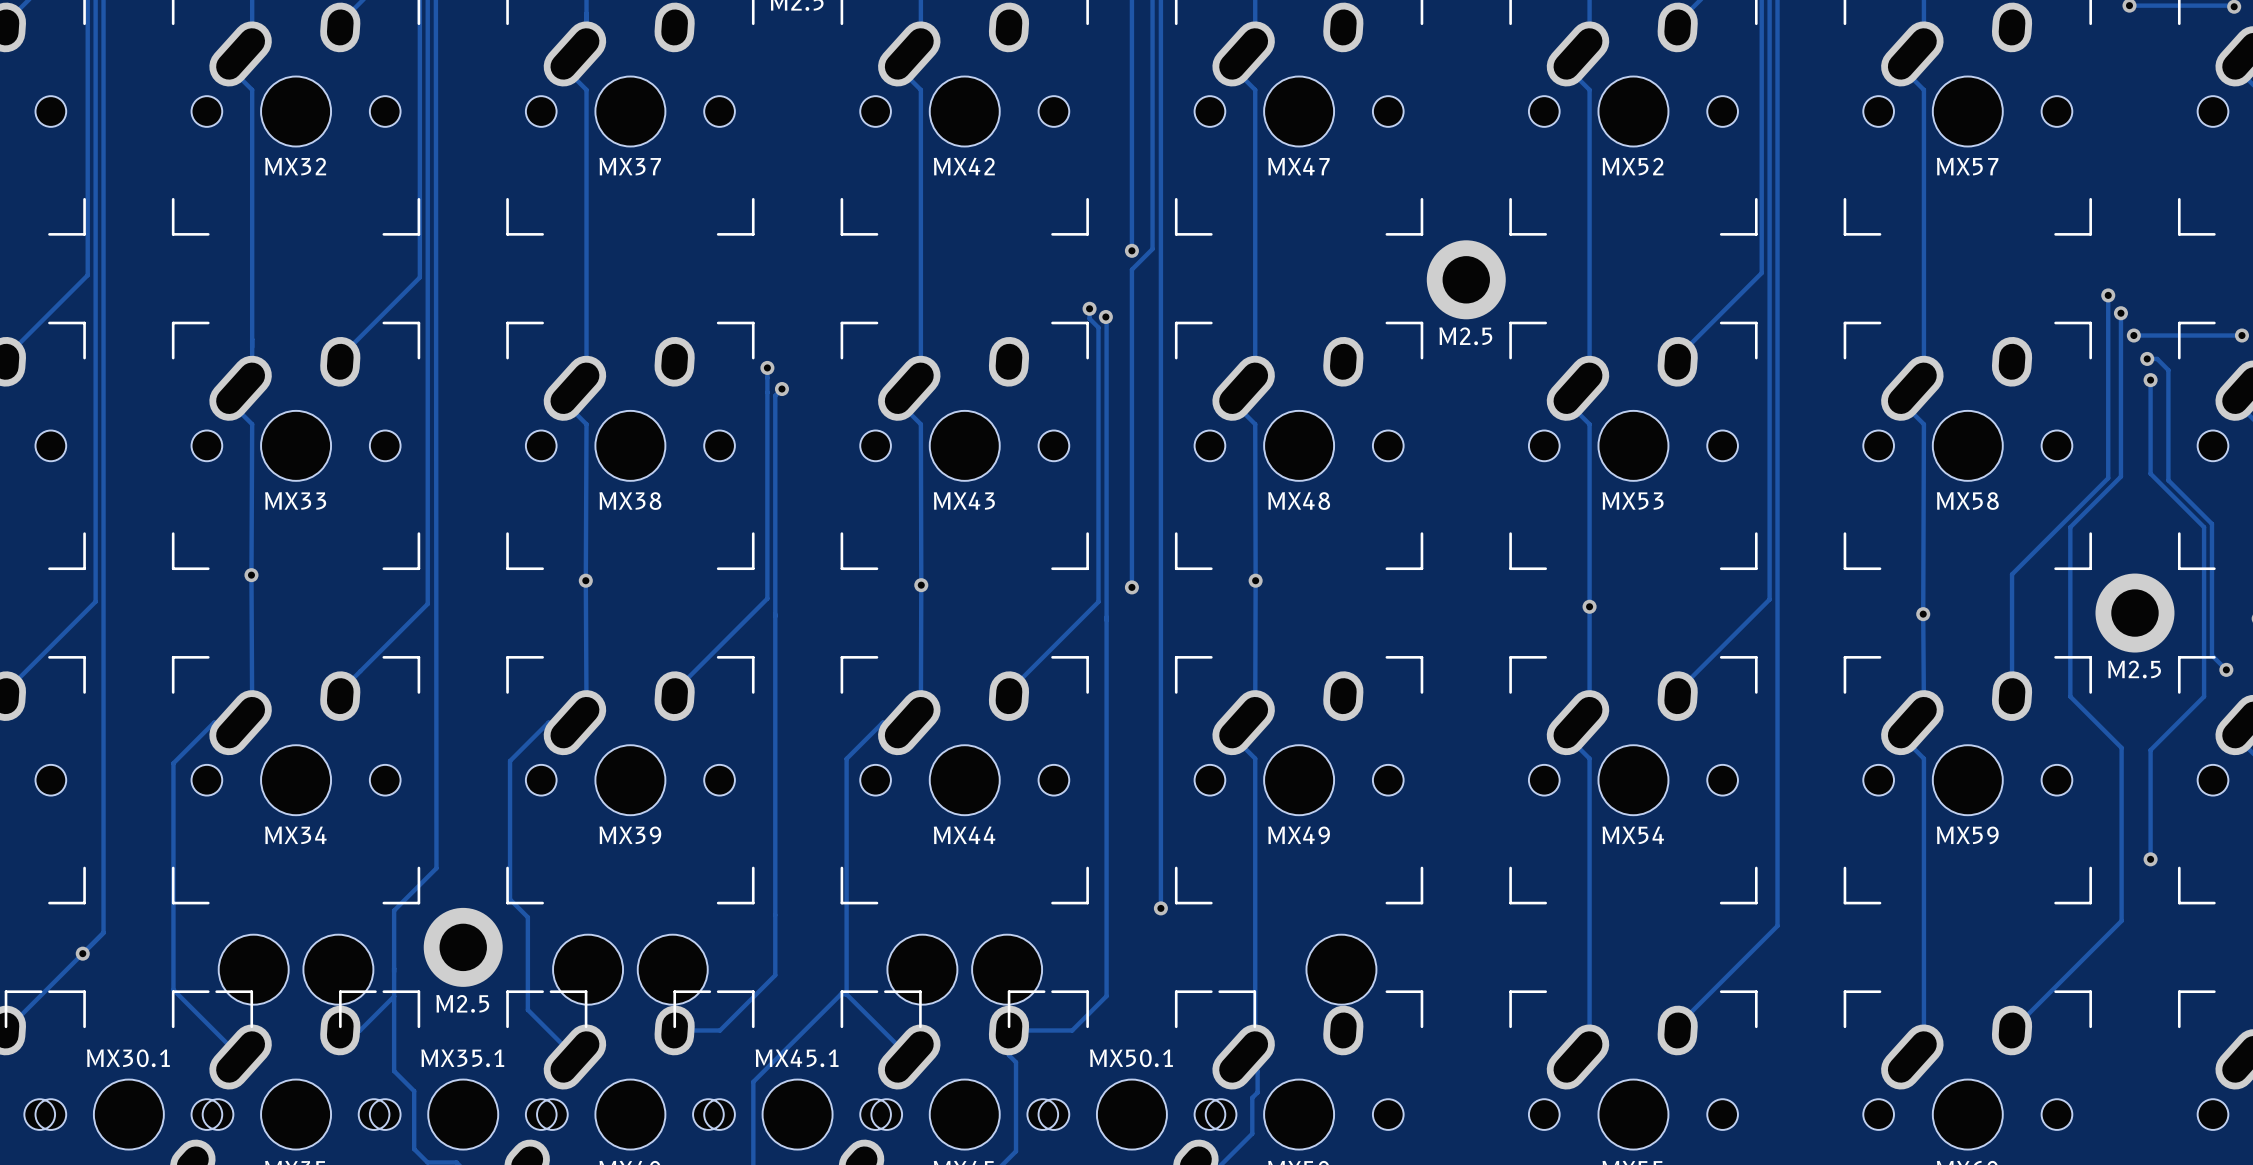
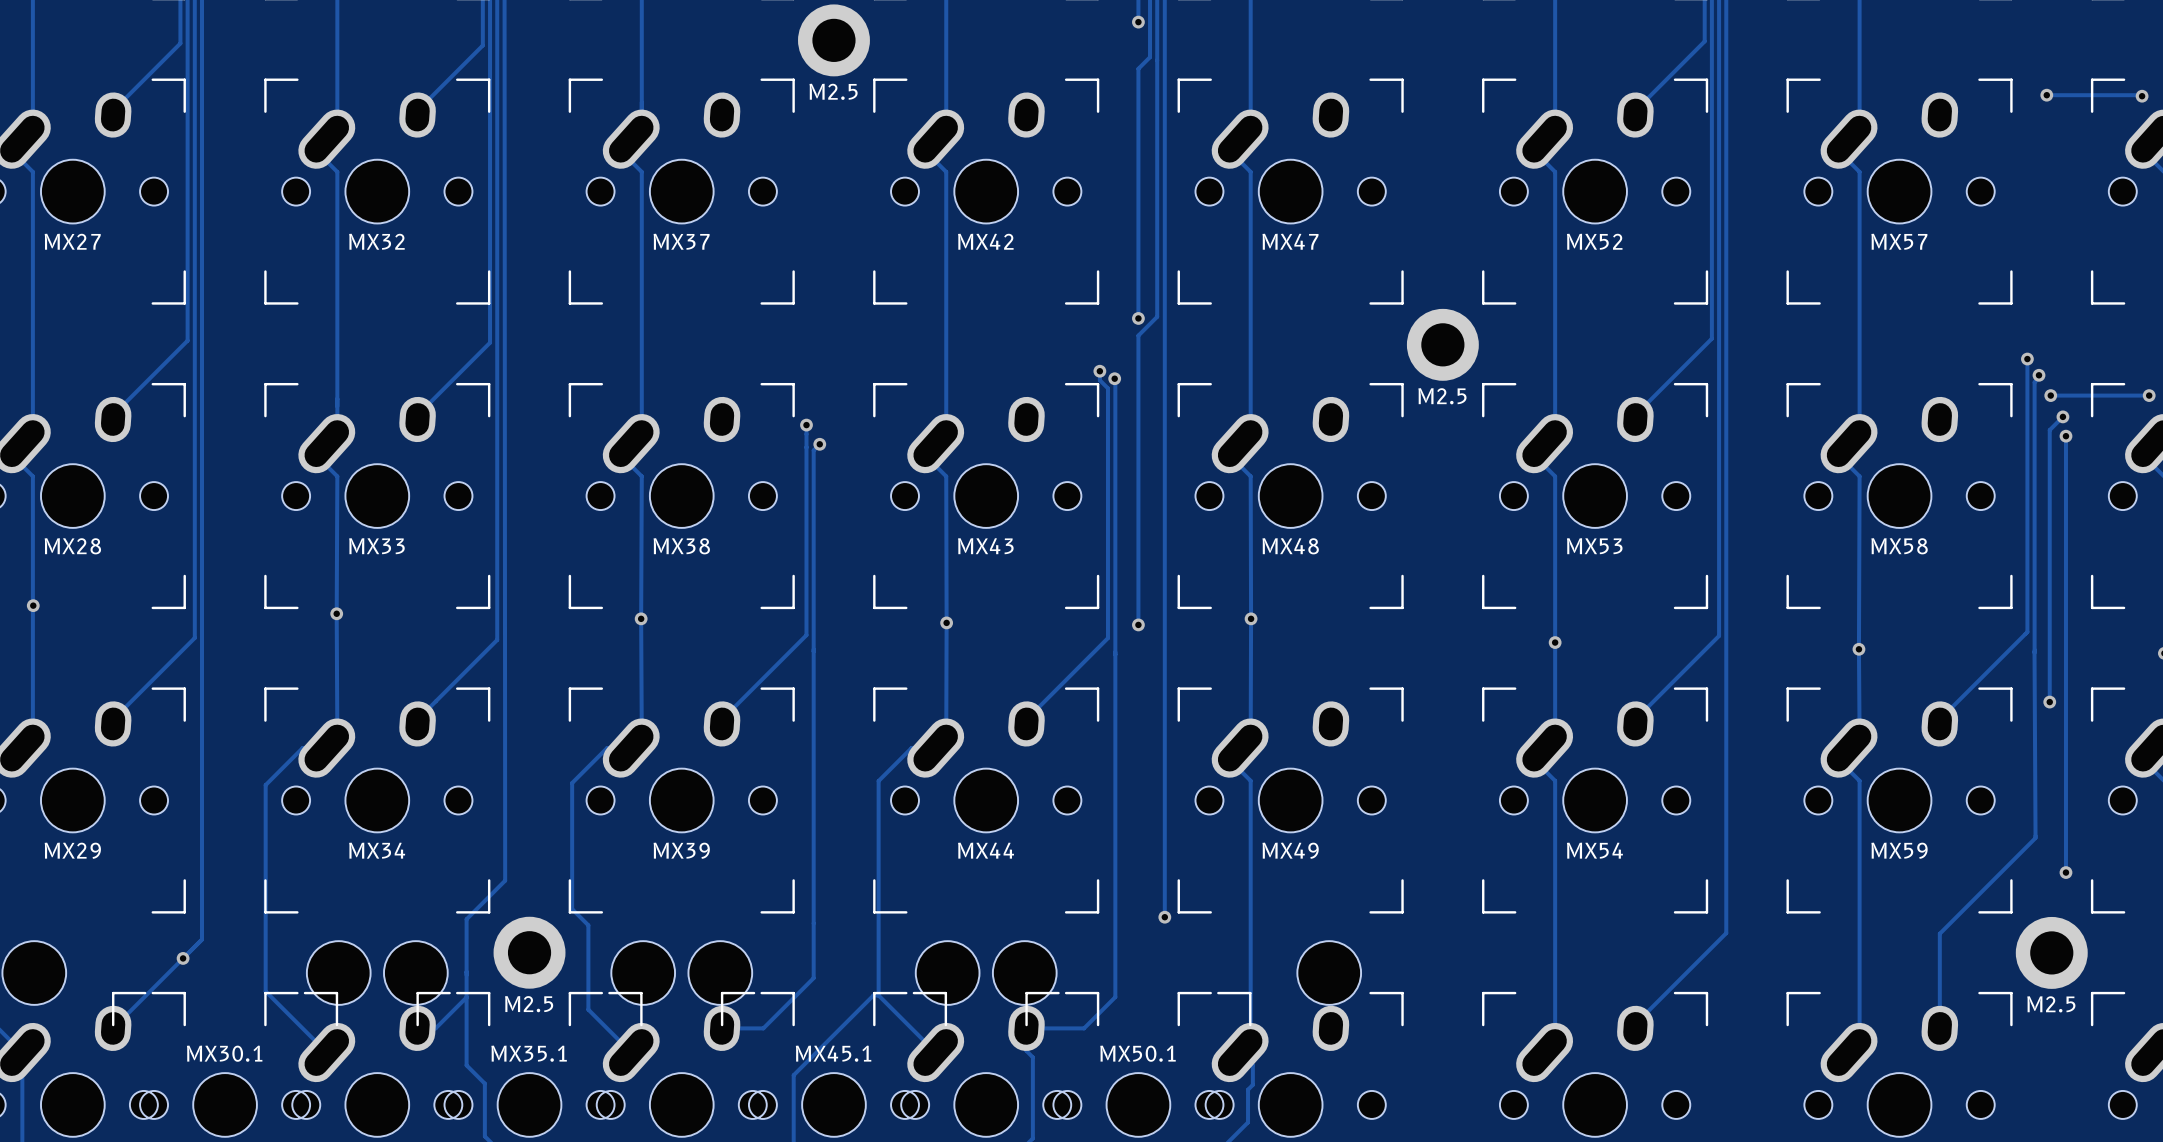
track: (2120, 316) (2120, 476) (2070, 527) (2070, 696) (2121, 747) (2121, 920) (2012, 1030) -> (2034, 652) (2035, 838) (1939, 933) (1939, 1028)
track: none -> (2039, 377) (2034, 382) (2034, 652)
track: (2147, 358) (2157, 358) (2168, 370) (2168, 480) (2211, 523) (2211, 655) (2226, 669) -> (2062, 416) (2049, 430) (2049, 702)
track: (2150, 473) (2204, 527) (2204, 696) (2150, 750) -> (2065, 521) (2065, 773)
track: (2108, 478) (2012, 574) (2012, 696) -> (2027, 525) (2027, 632) (1940, 719)
part position: (2134, 613) -> (2051, 952)
via position: (2226, 669) -> (2049, 702)

